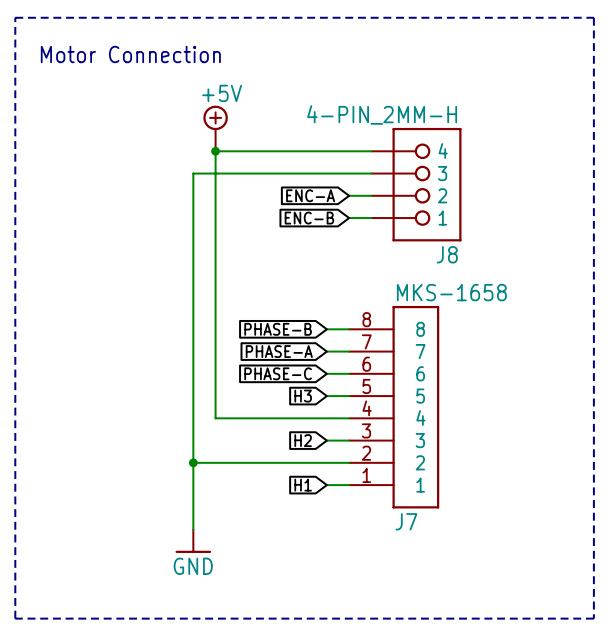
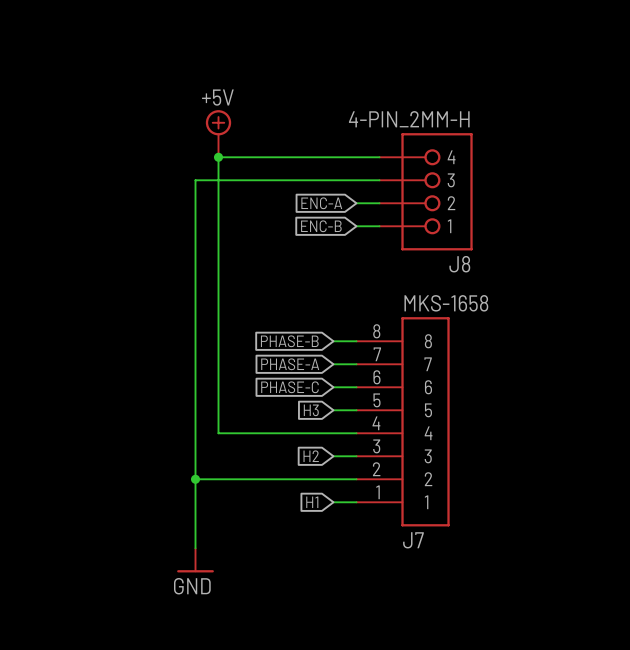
line: (15, 17) (593, 17) (593, 618) (15, 618) (15, 17) -> none
text: Motor Connection (130, 54) -> none

